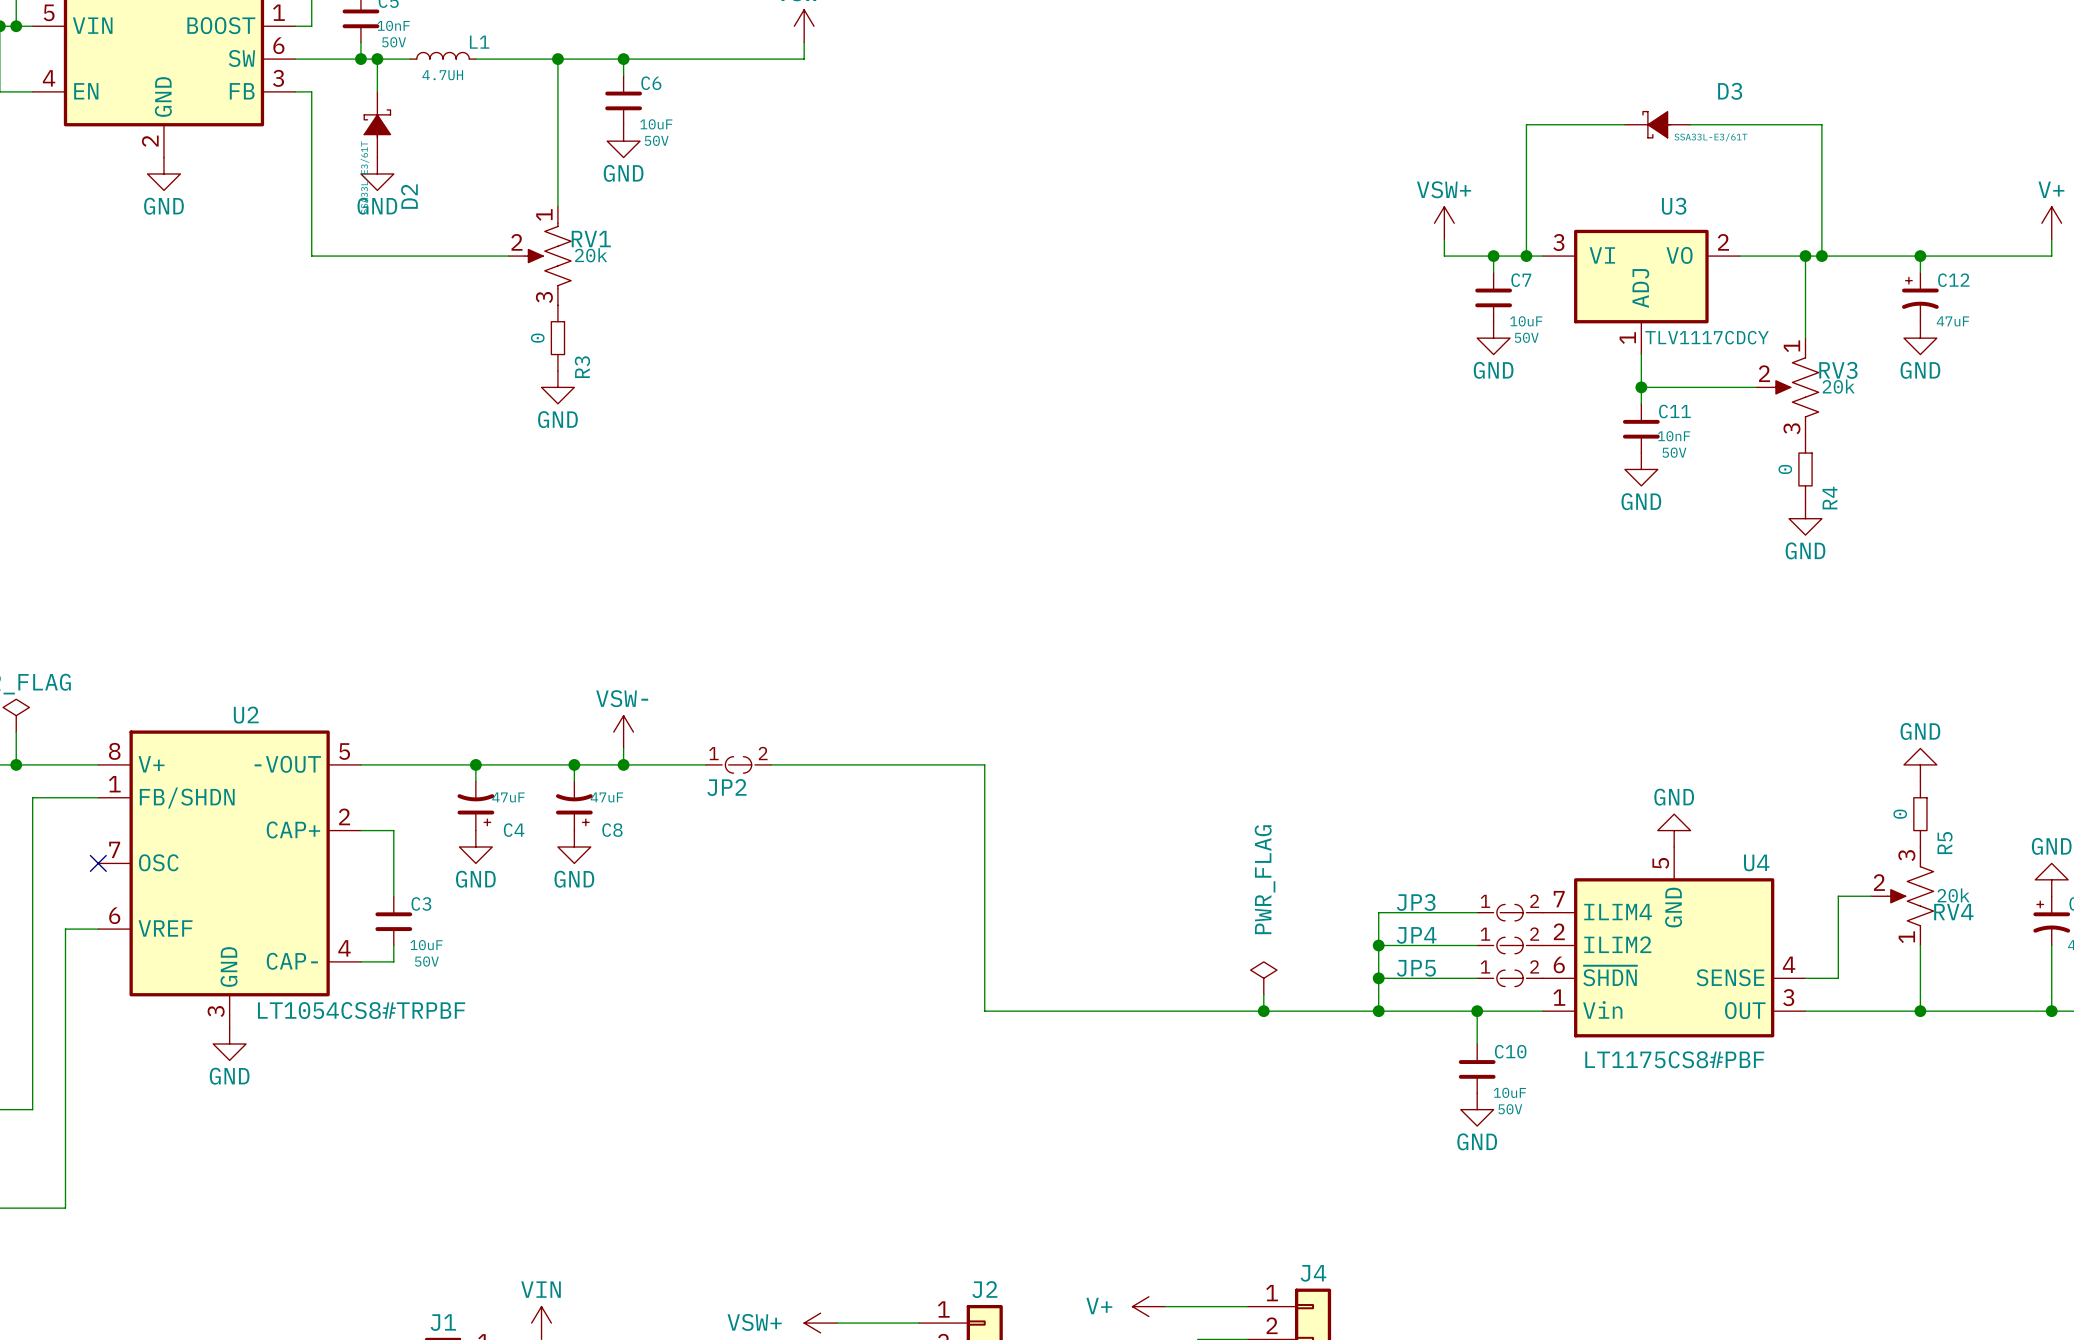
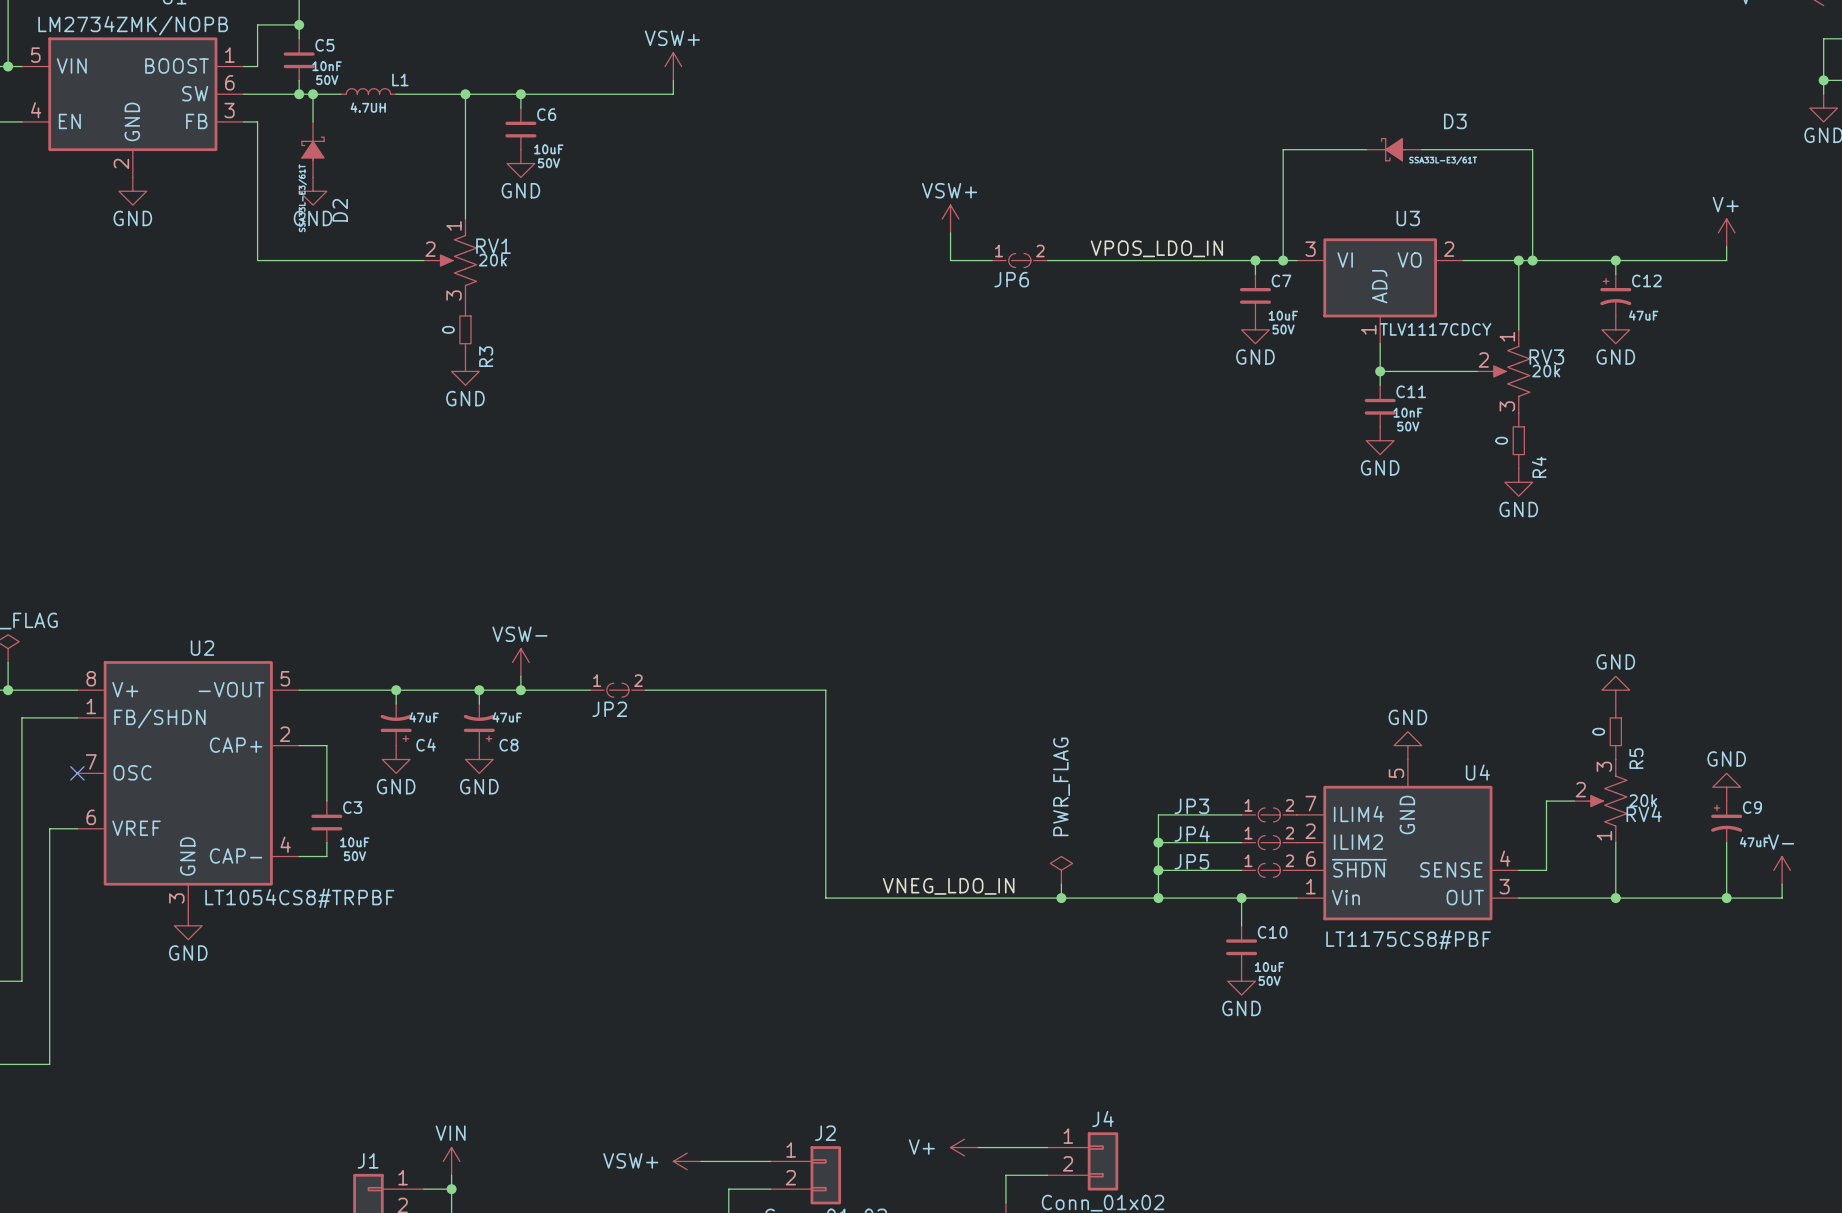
wire: none -> (950, 232) (950, 260) (992, 260)
power symbol position: VSW+ (1444, 223) -> VSW+ (950, 218)
wire: (1444, 239) (1444, 256) -> (1047, 260) (1213, 260)
label: none -> VPOS_LDO_IN (1156, 248)
JP6: none -> (1019, 260)
label: none -> VNEG_LDO_IN (948, 886)

